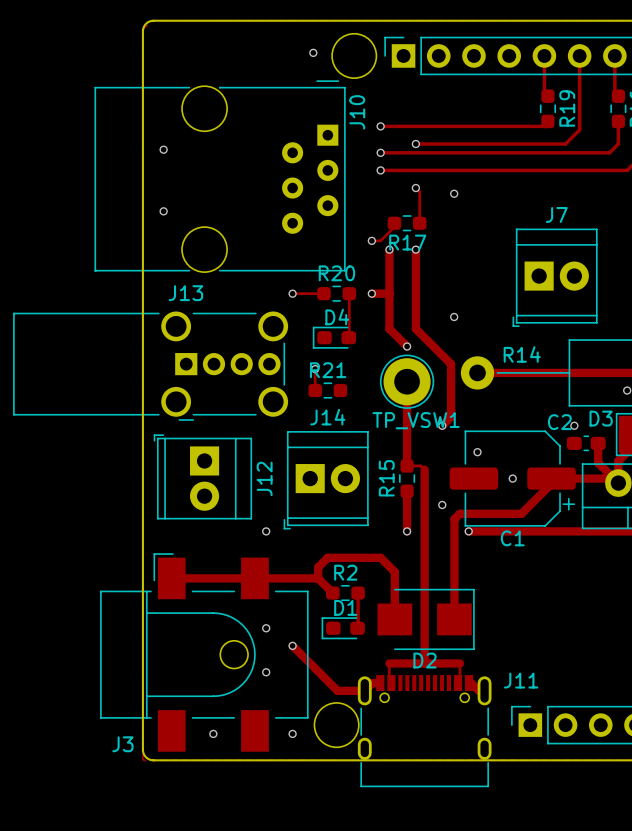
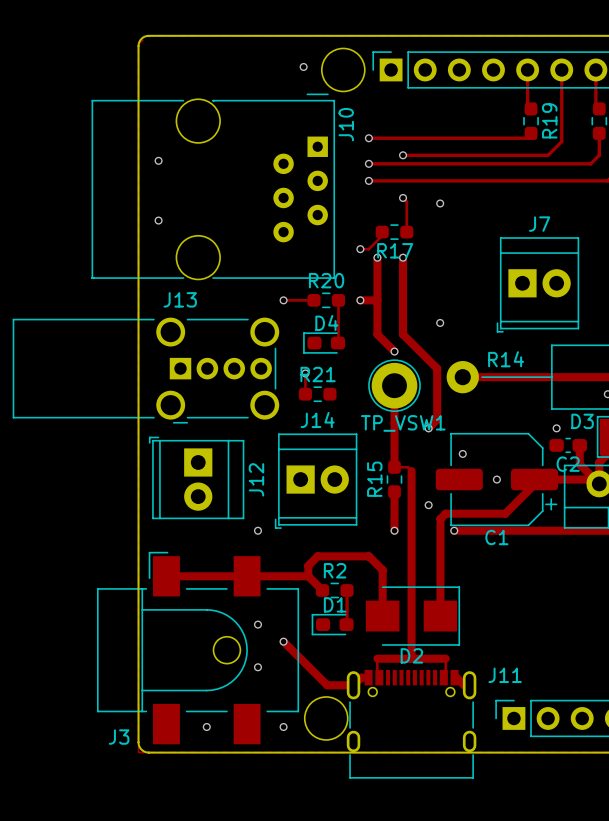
C2 name position: C2 (559, 422) -> C2 (568, 464)

